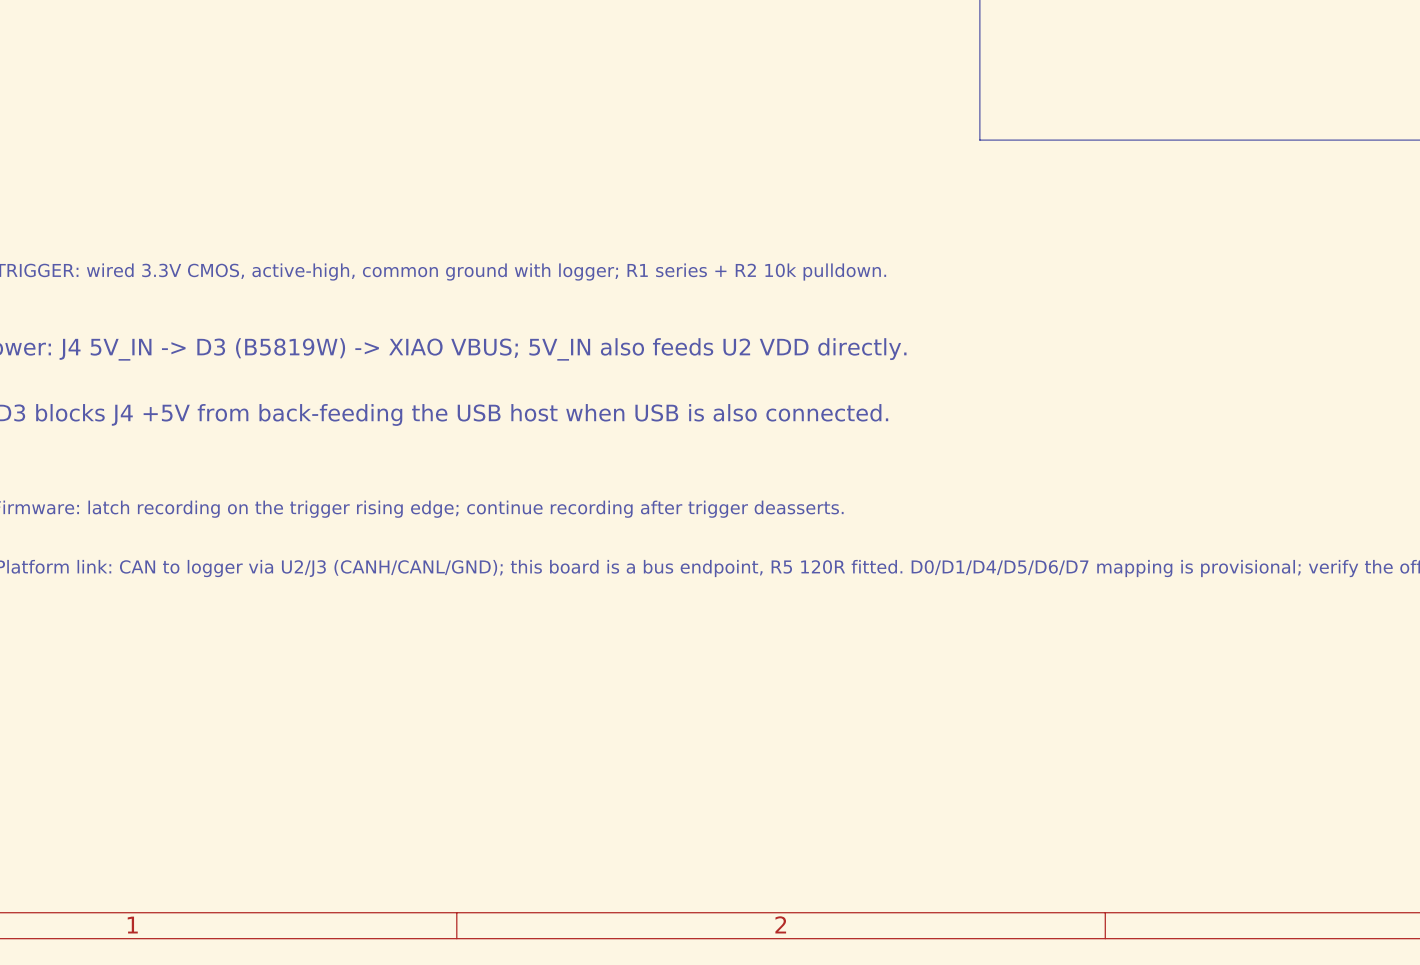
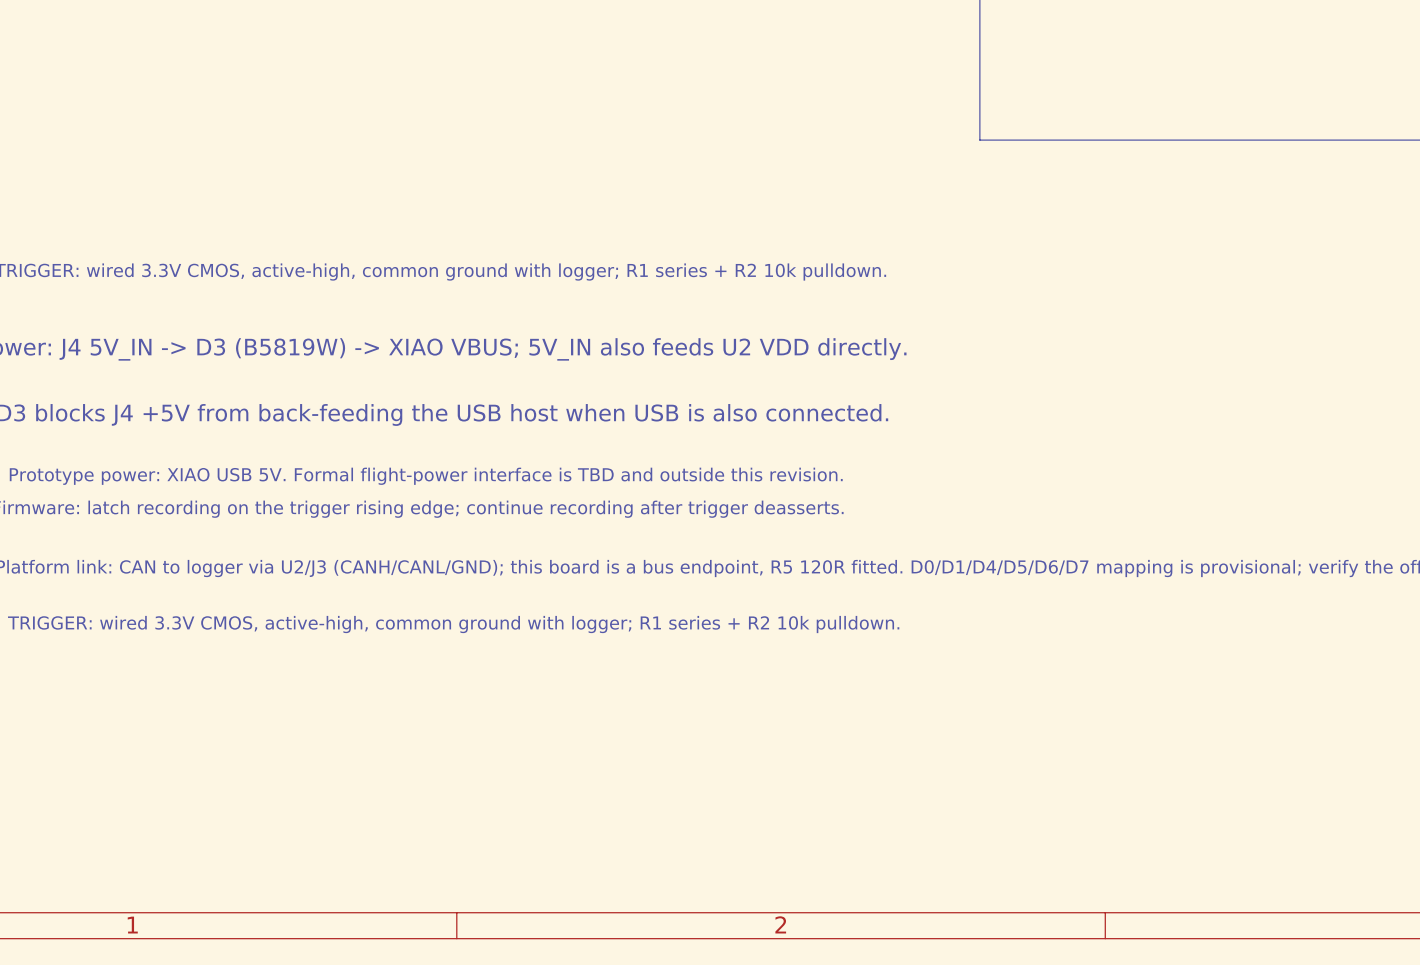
text: none -> Prototype power: XIAO USB 5V. Formal flight-power interface is TBD and outside this revision. (426, 476)
text: none -> TRIGGER: wired 3.3V CMOS, active-high, common ground with logger; R1 series + R2 10k pulldown. (453, 624)

